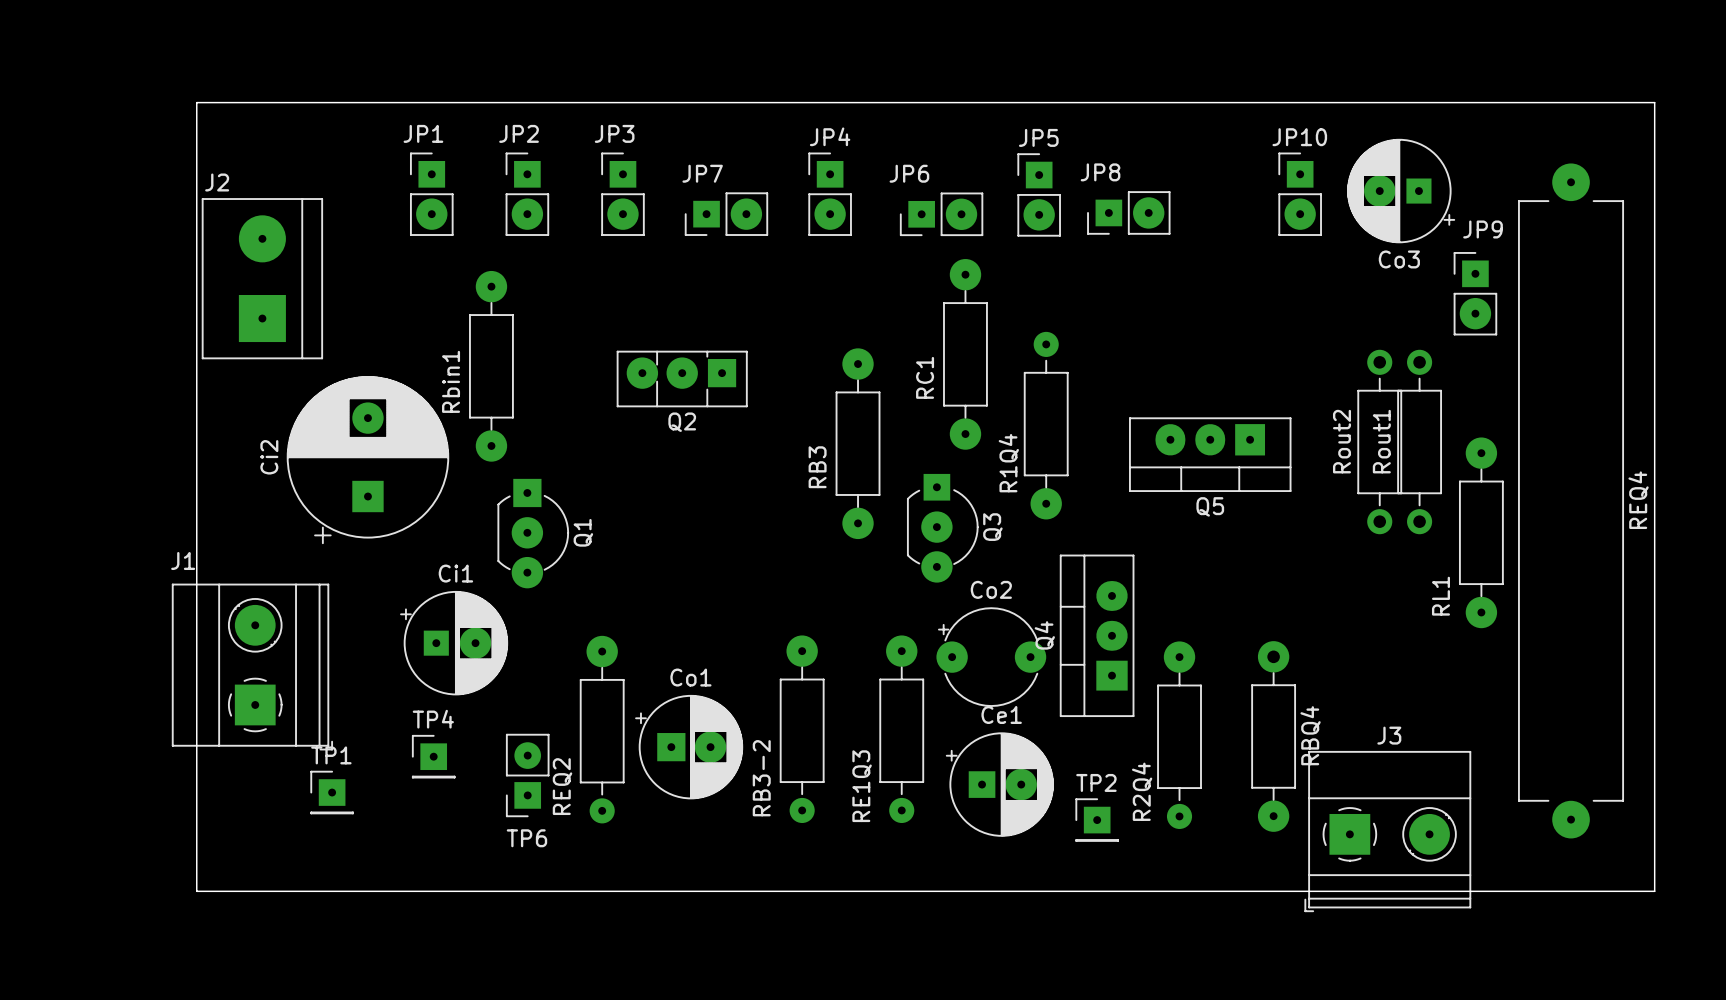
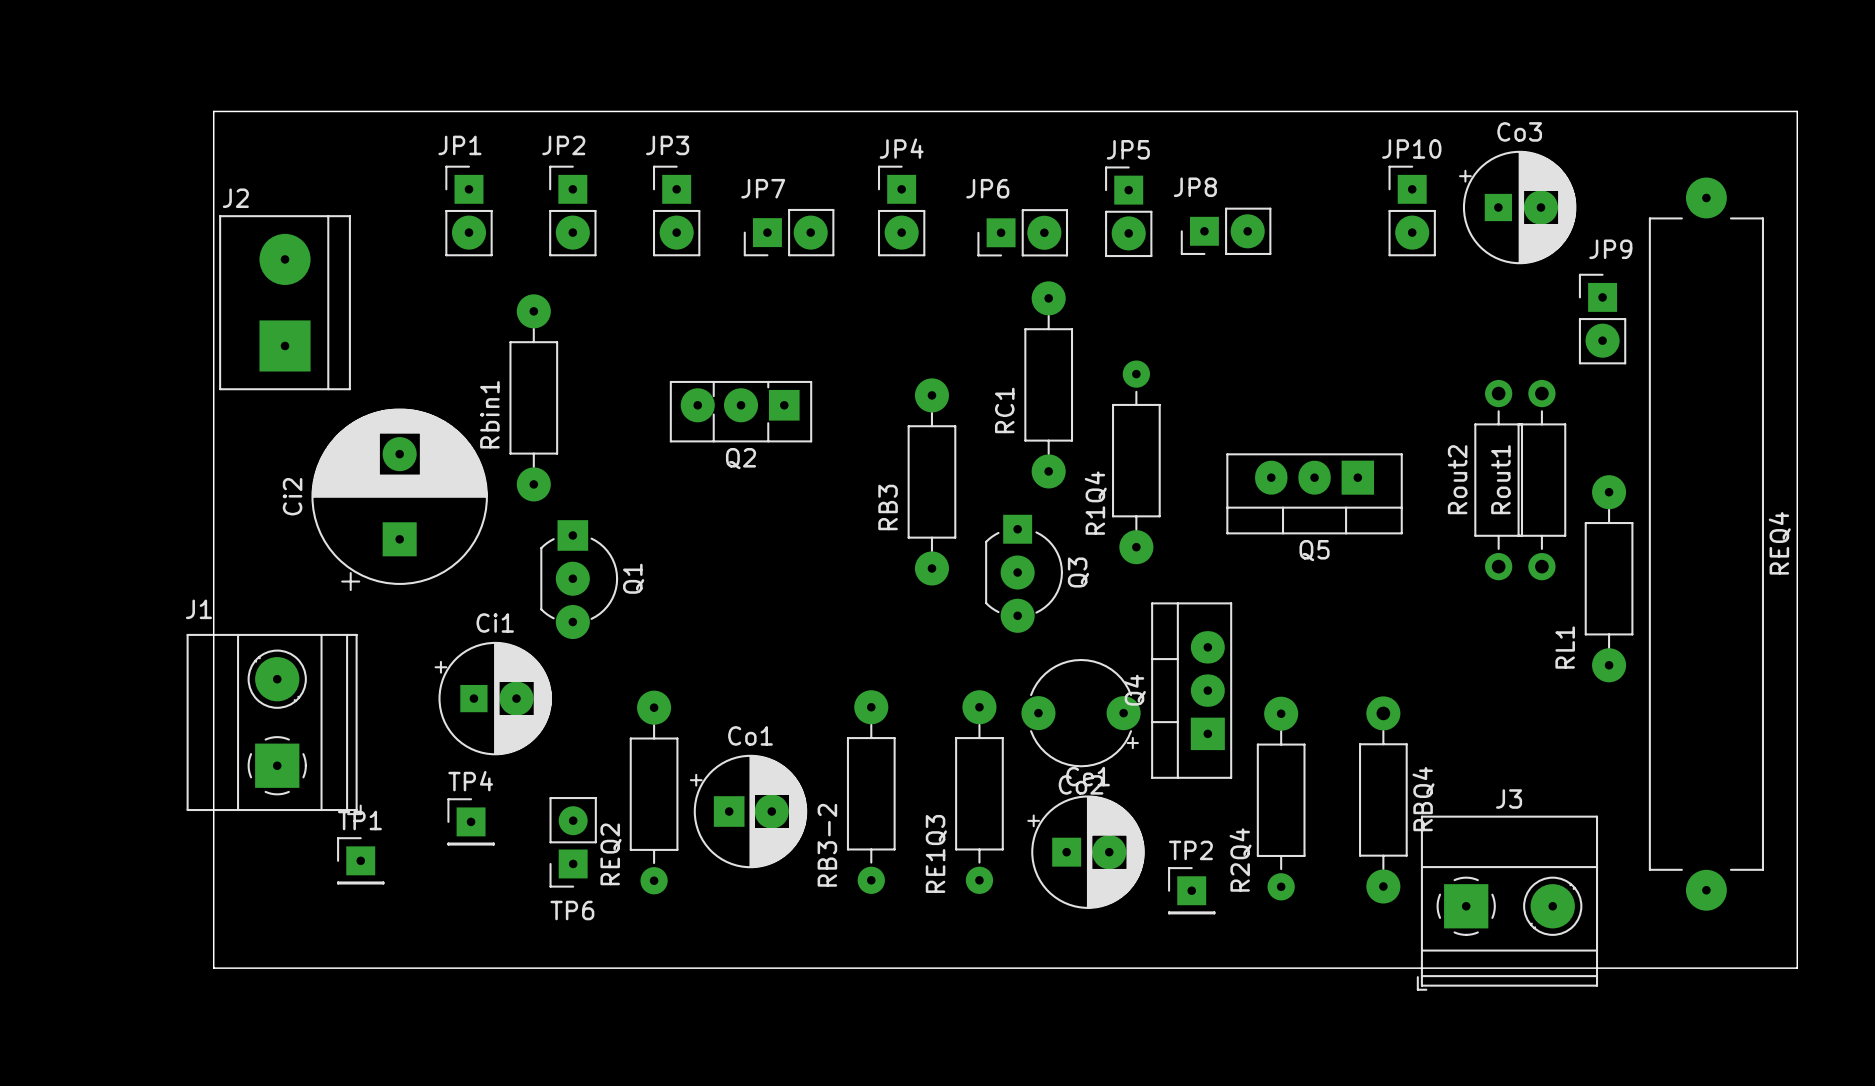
Co3 rotation: 0° (1401, 191) -> 180° (1517, 207)
Co2 rotation: 0° (991, 657) -> 180° (1081, 713)

